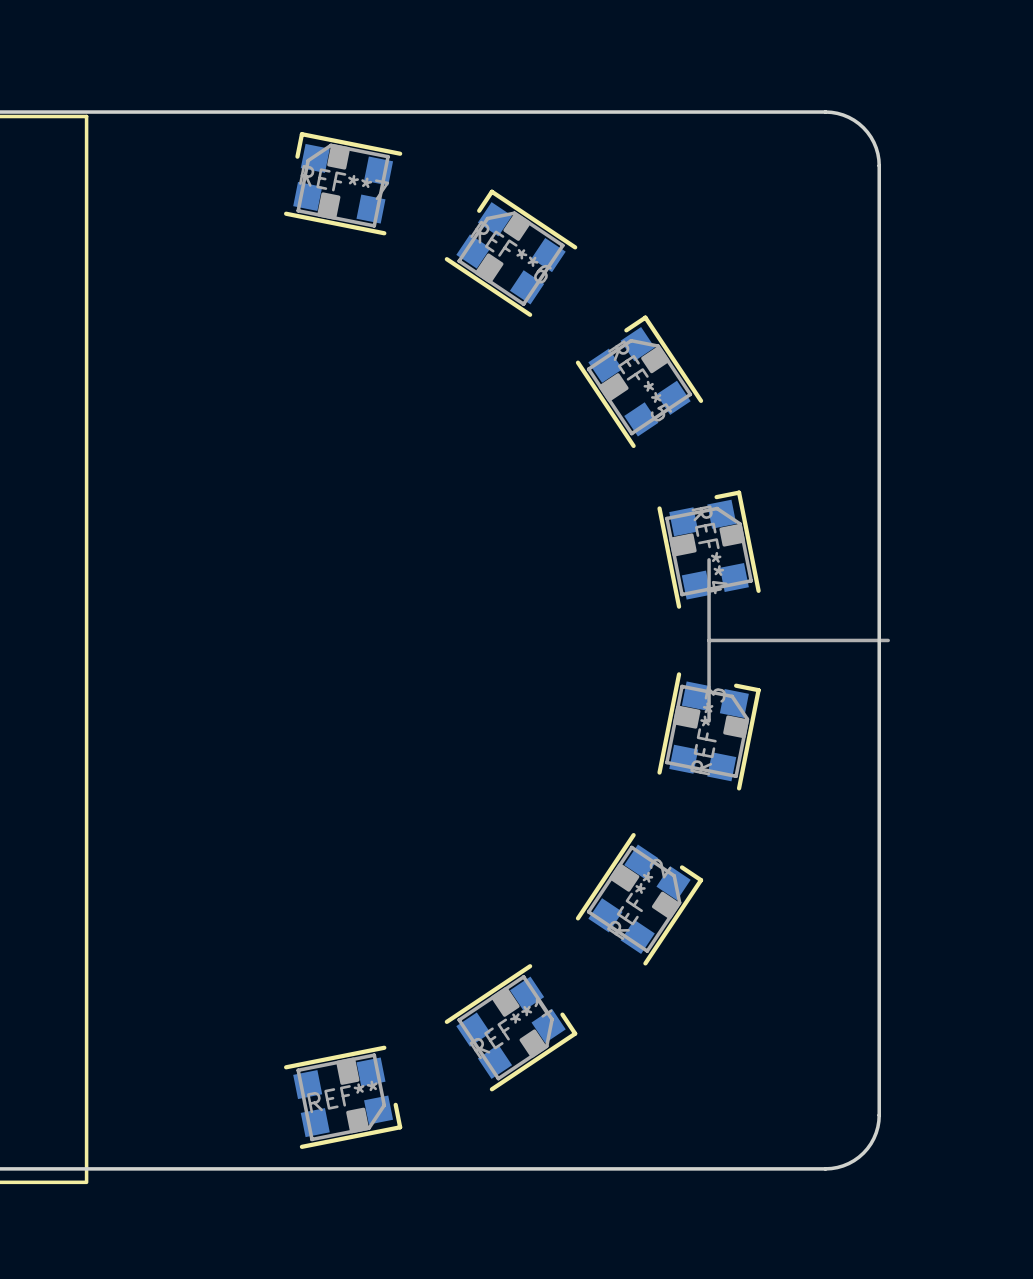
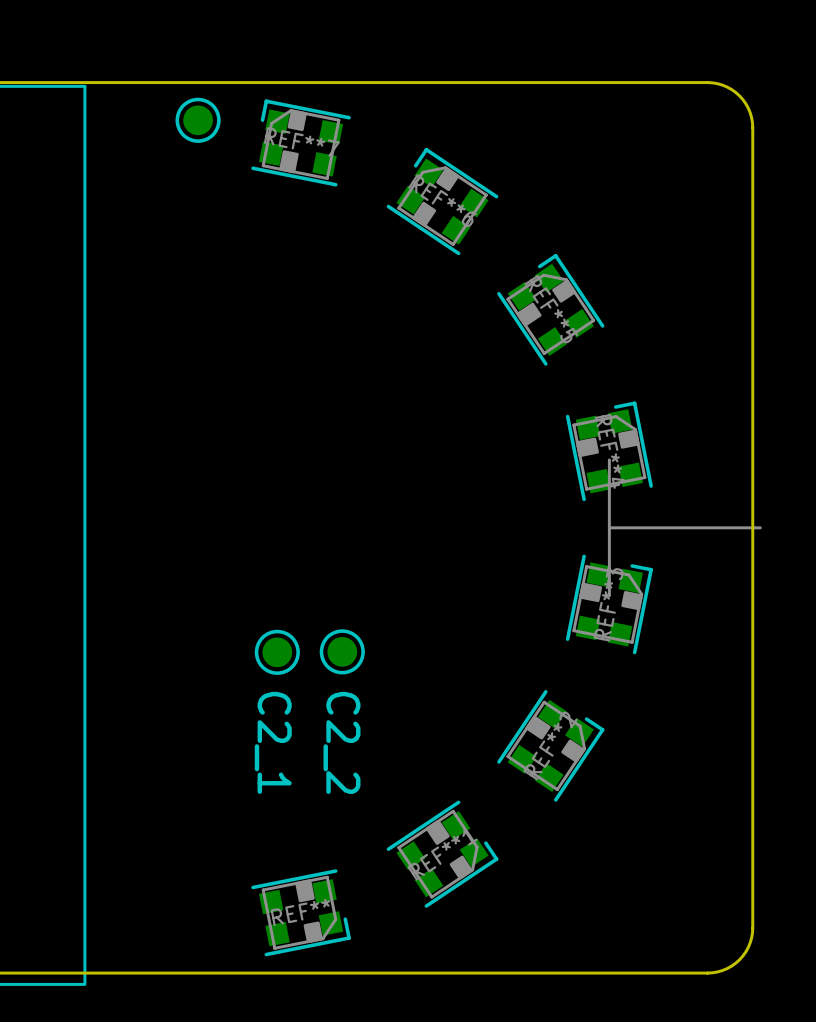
part: none -> (198, 120)
part: none -> C2_2 (342, 651)
part: none -> C2_1 (277, 652)

